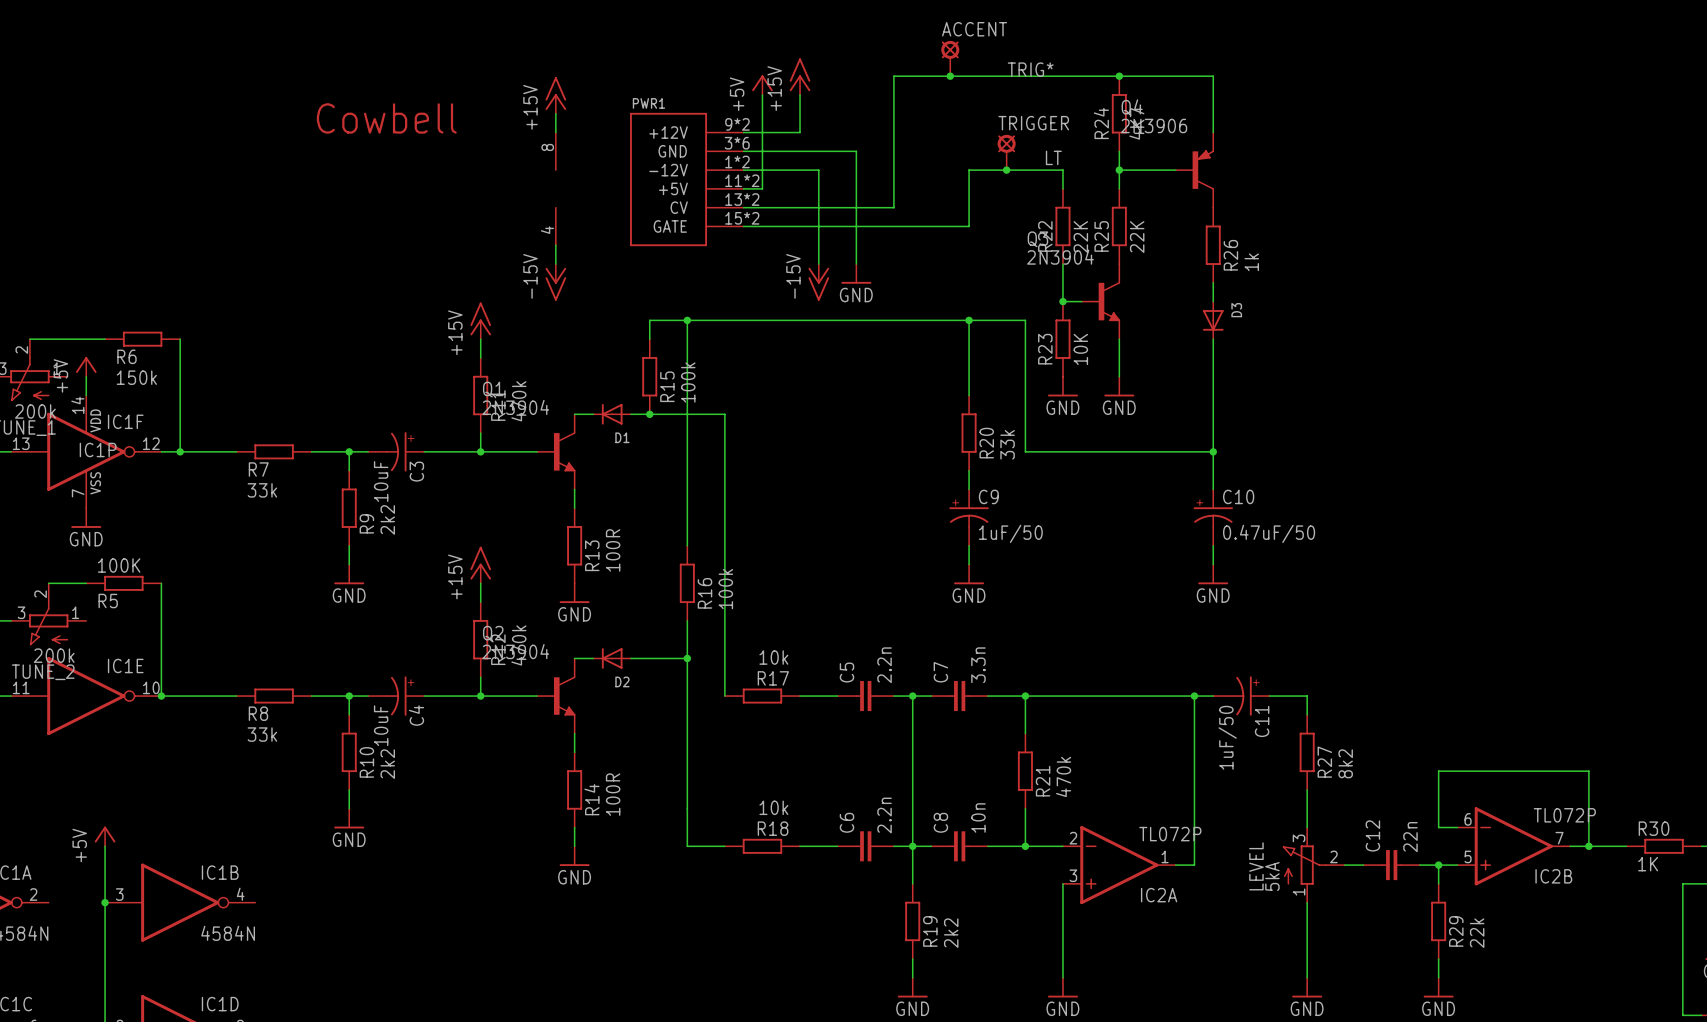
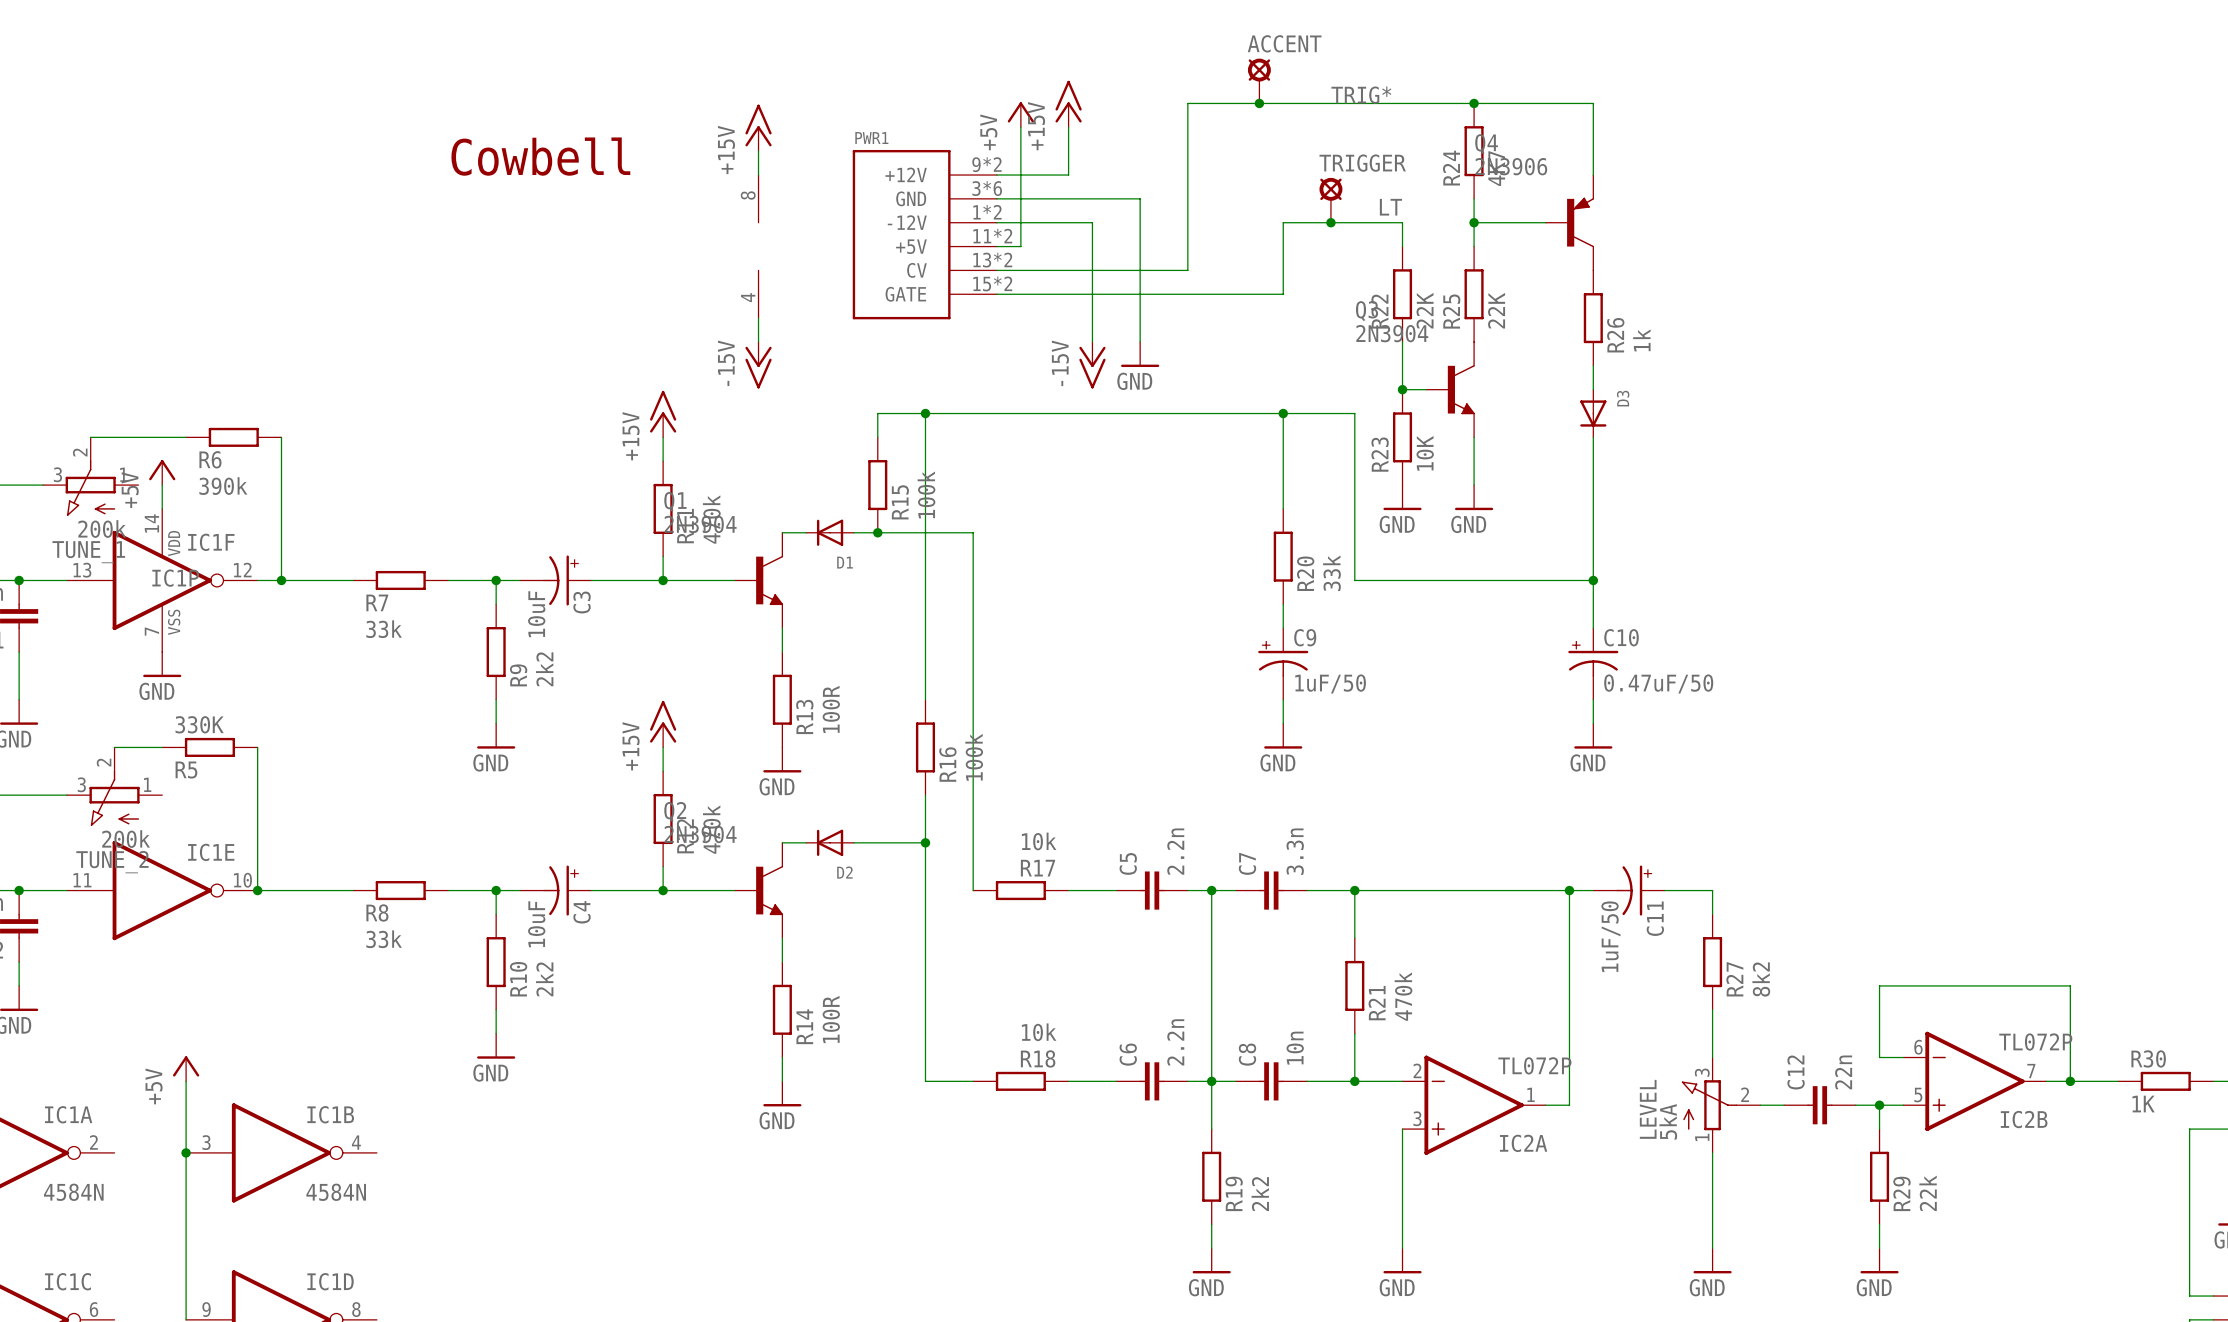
R6 value: 150k (136, 377) -> 390k (223, 486)
R5 value: 100K (119, 565) -> 330K (199, 724)

